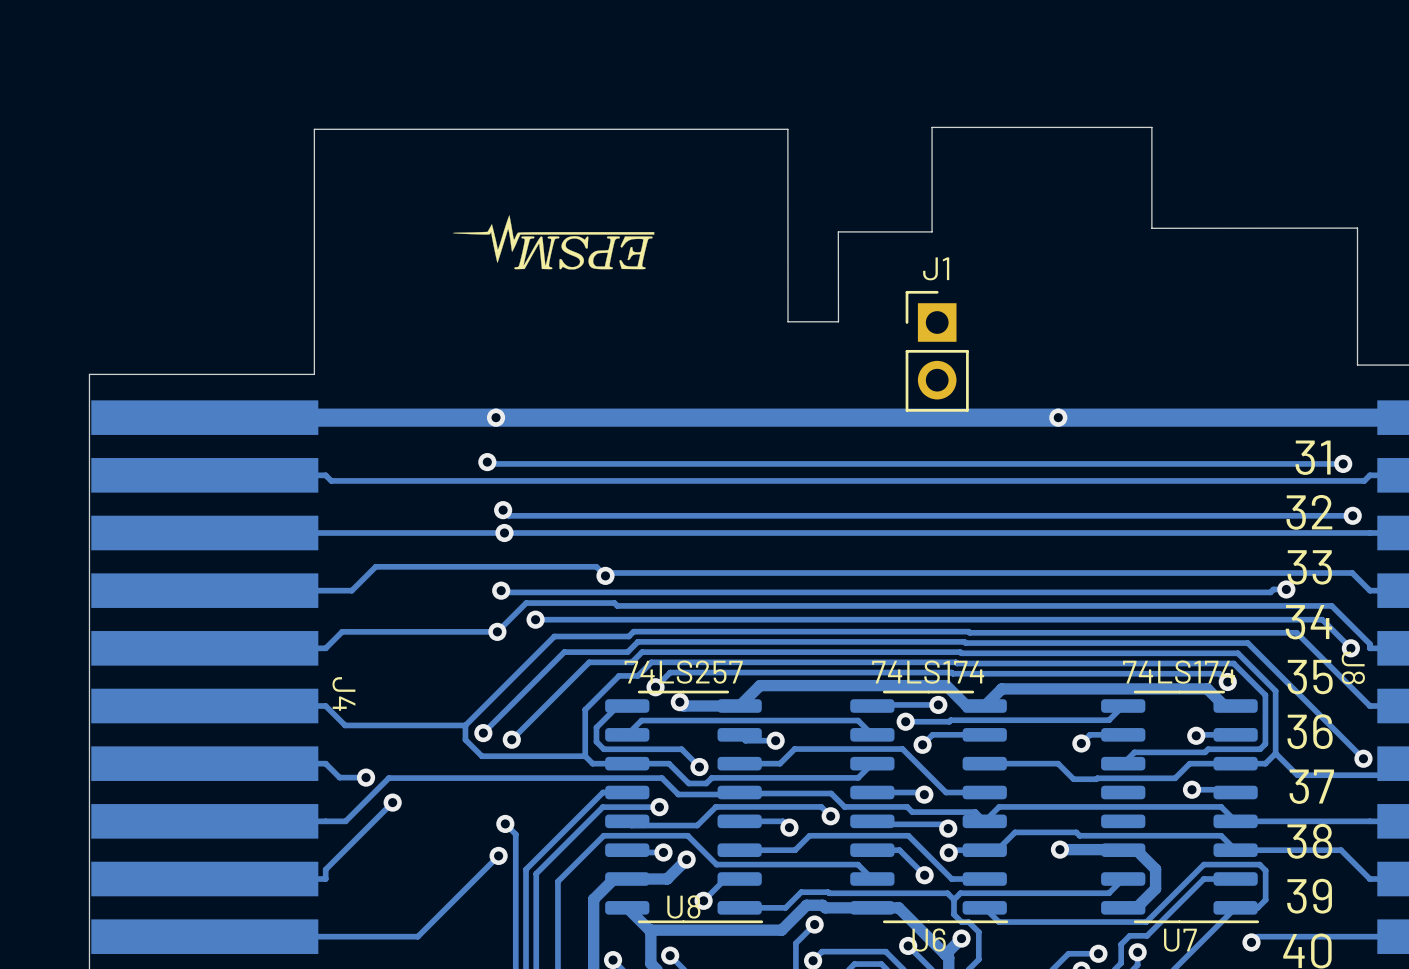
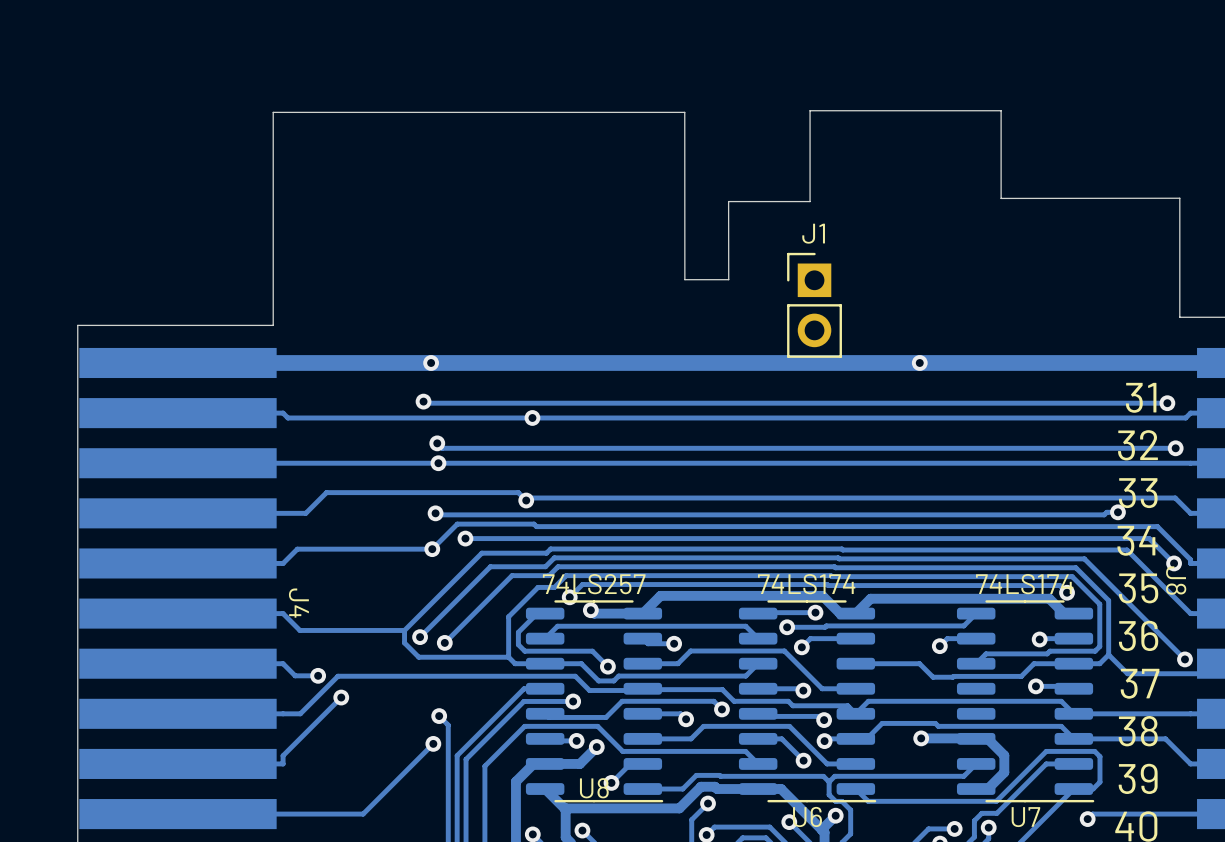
drawing: [453, 215, 655, 270] -> none
via: none -> (532, 417)

